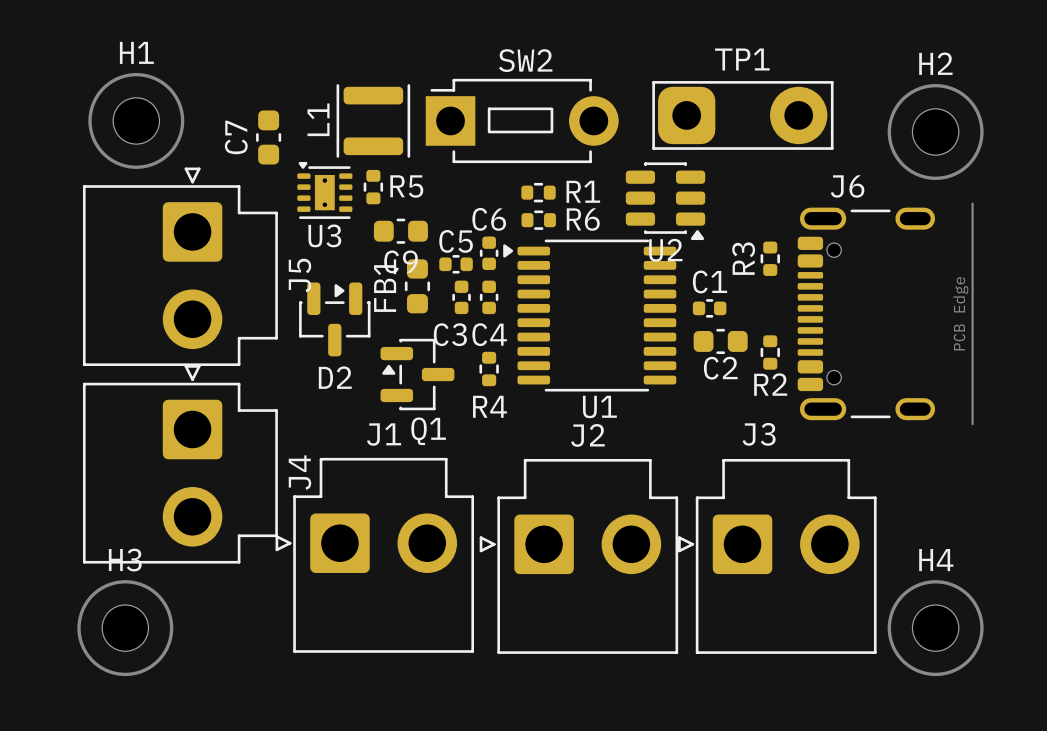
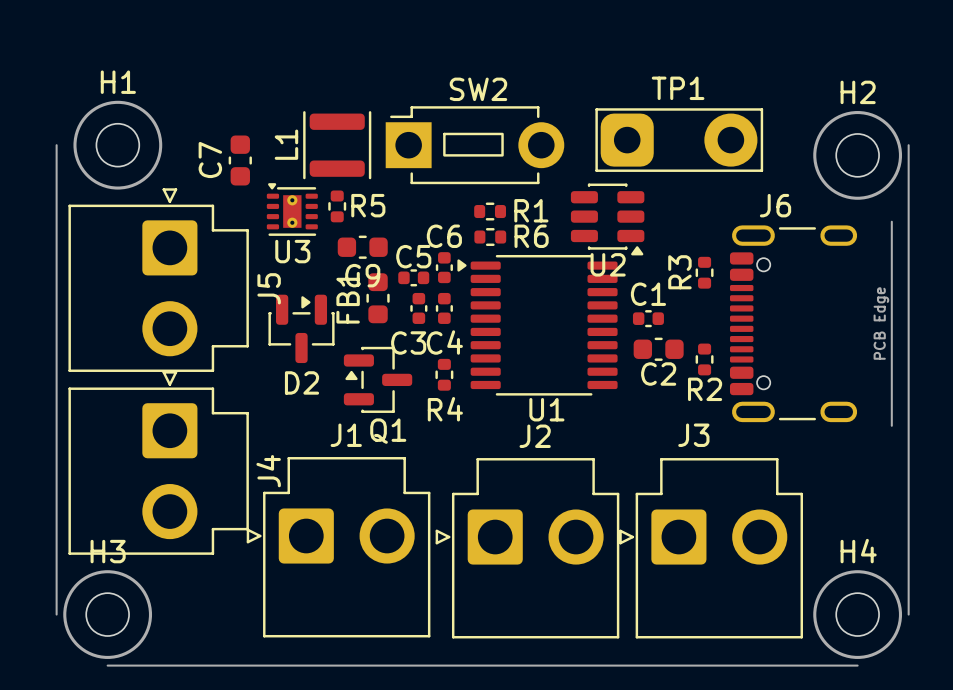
line: none -> (56, 145) (56, 614)
line: none -> (908, 145) (908, 614)
line: none -> (107, 665) (857, 665)

